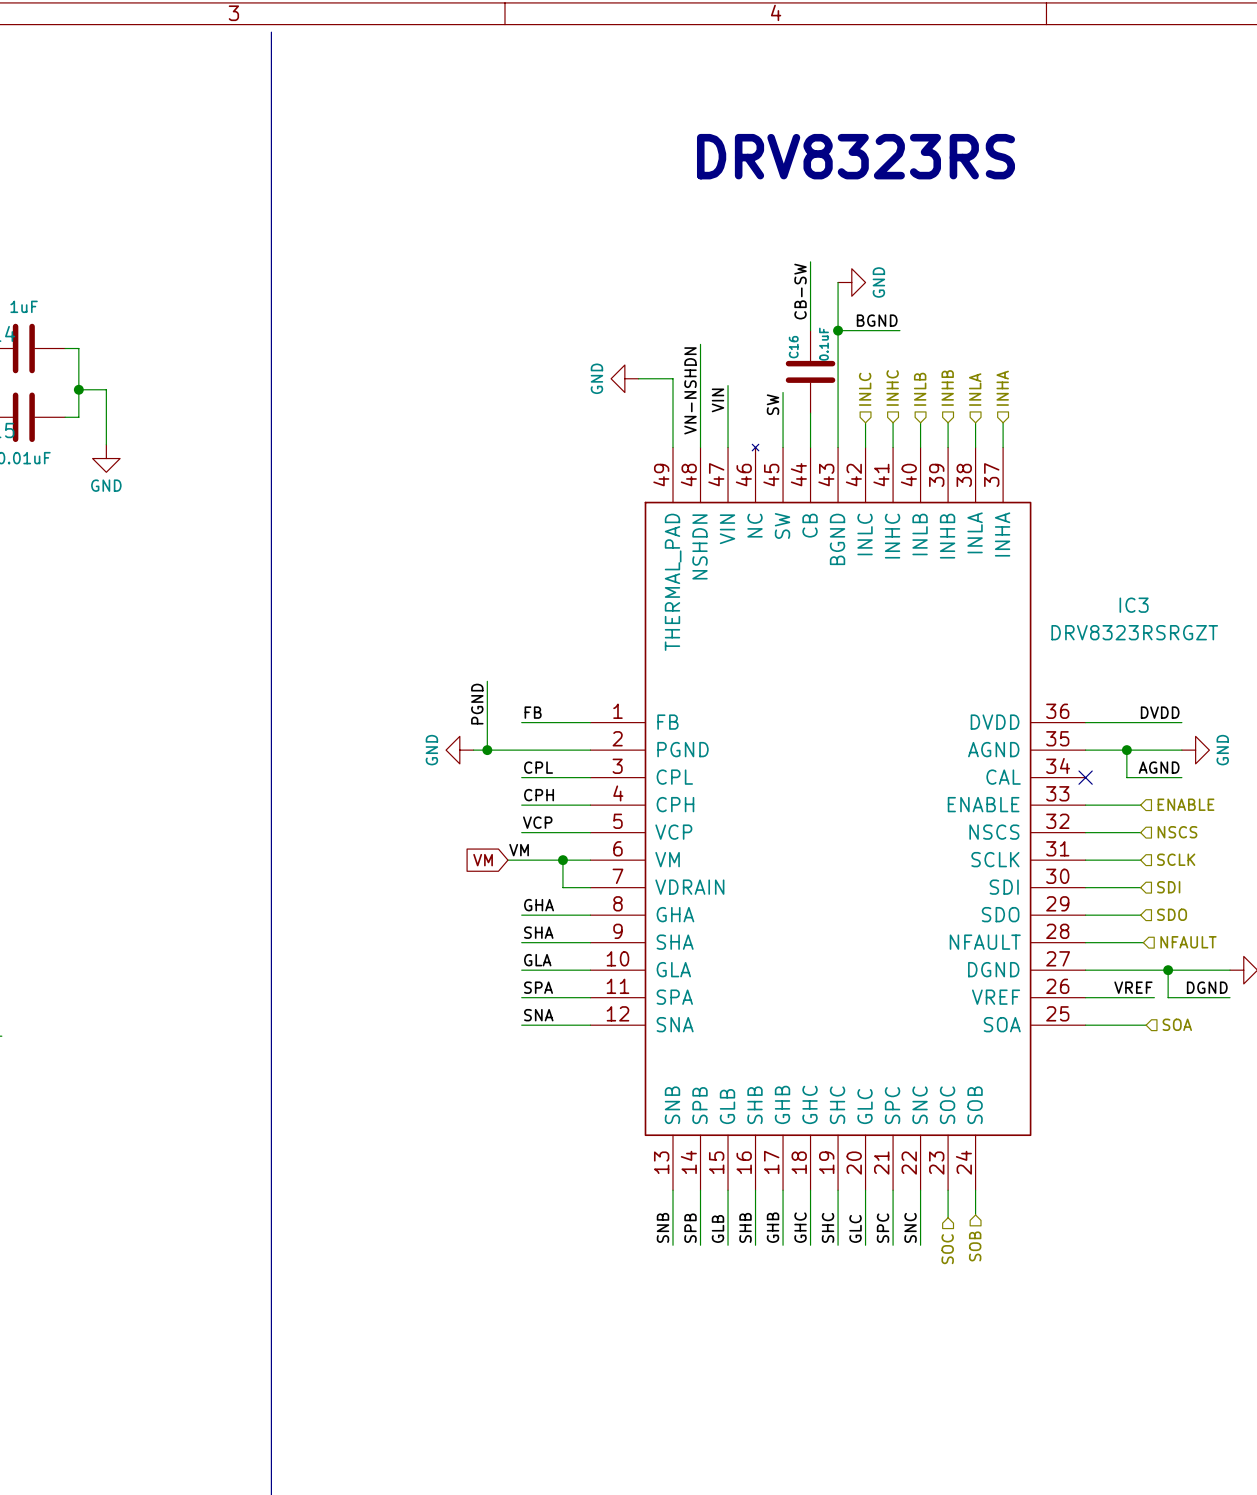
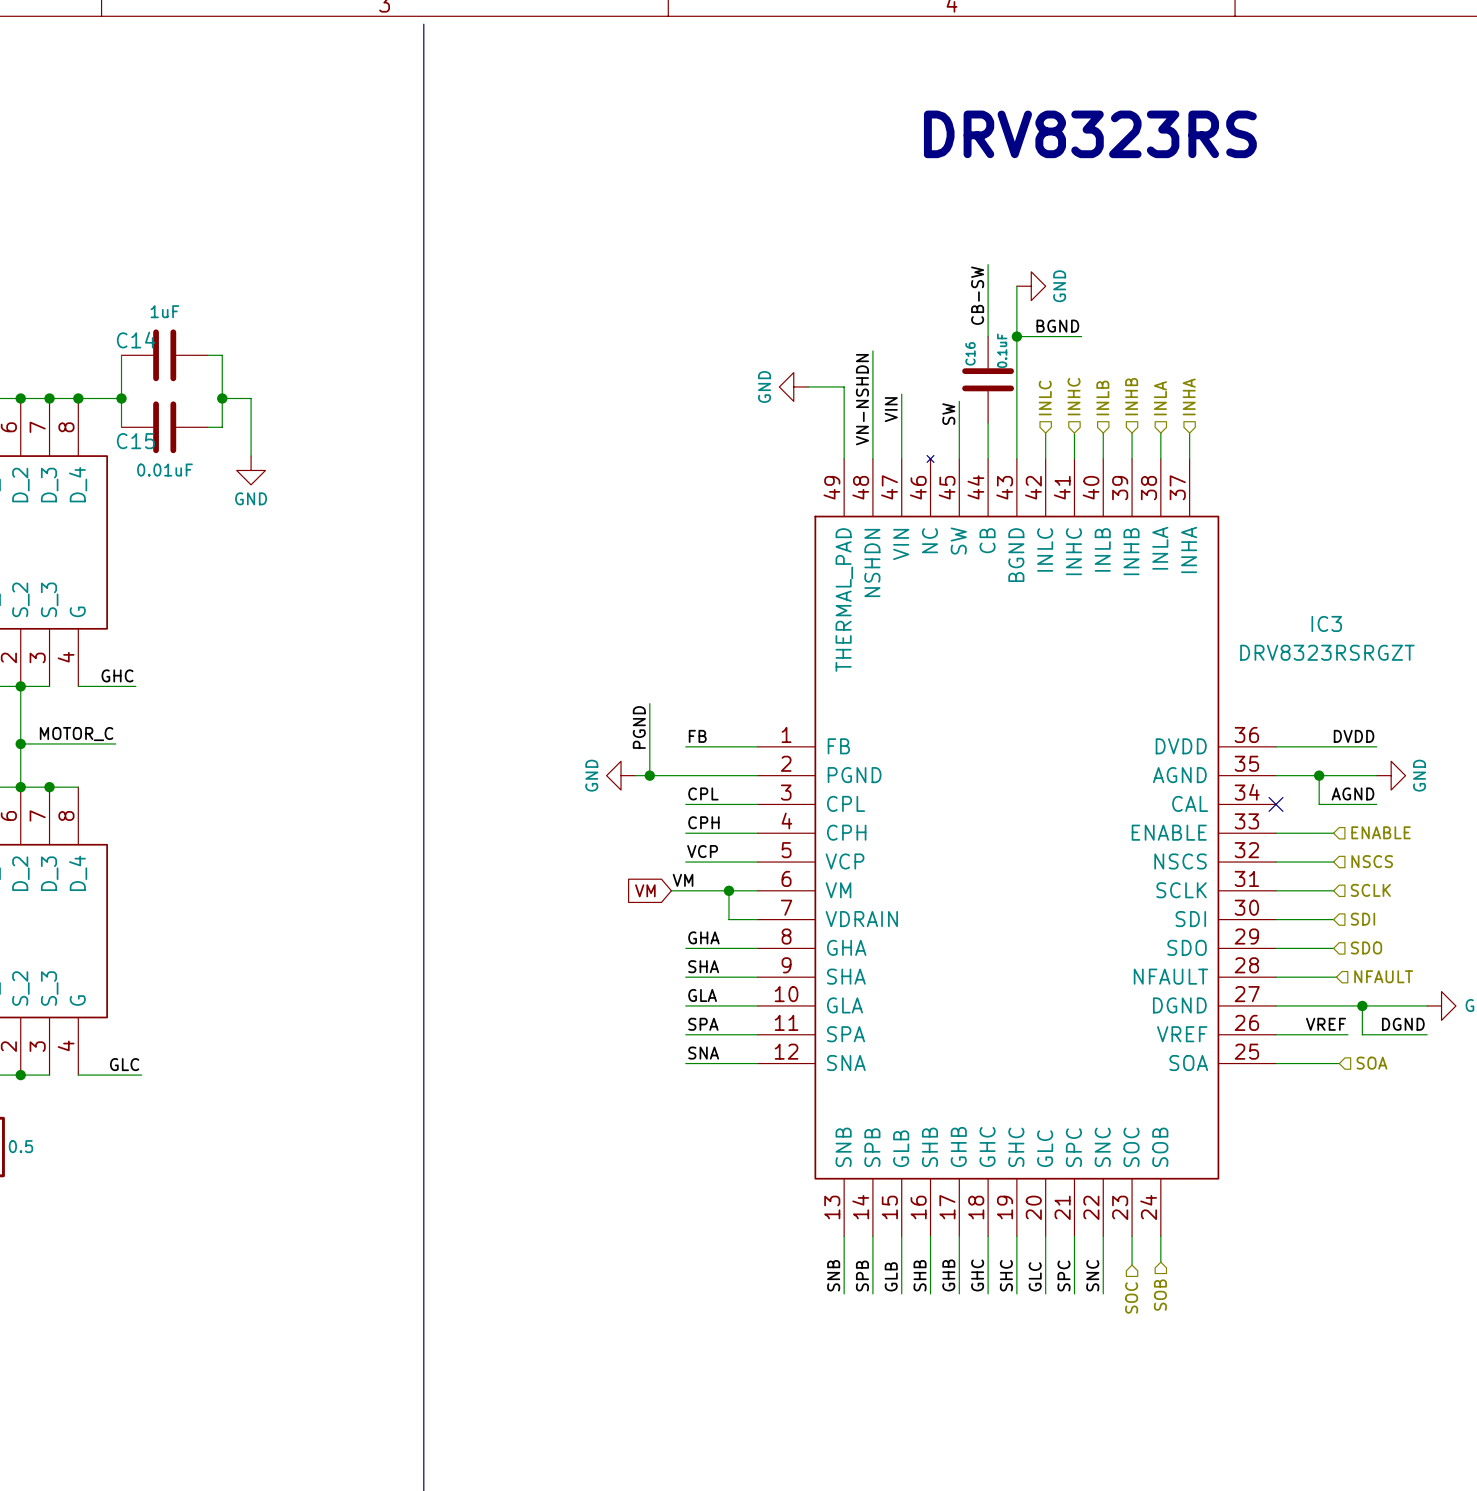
text position: DRV8323RS (855, 156) -> DRV8323RS (1090, 134)

